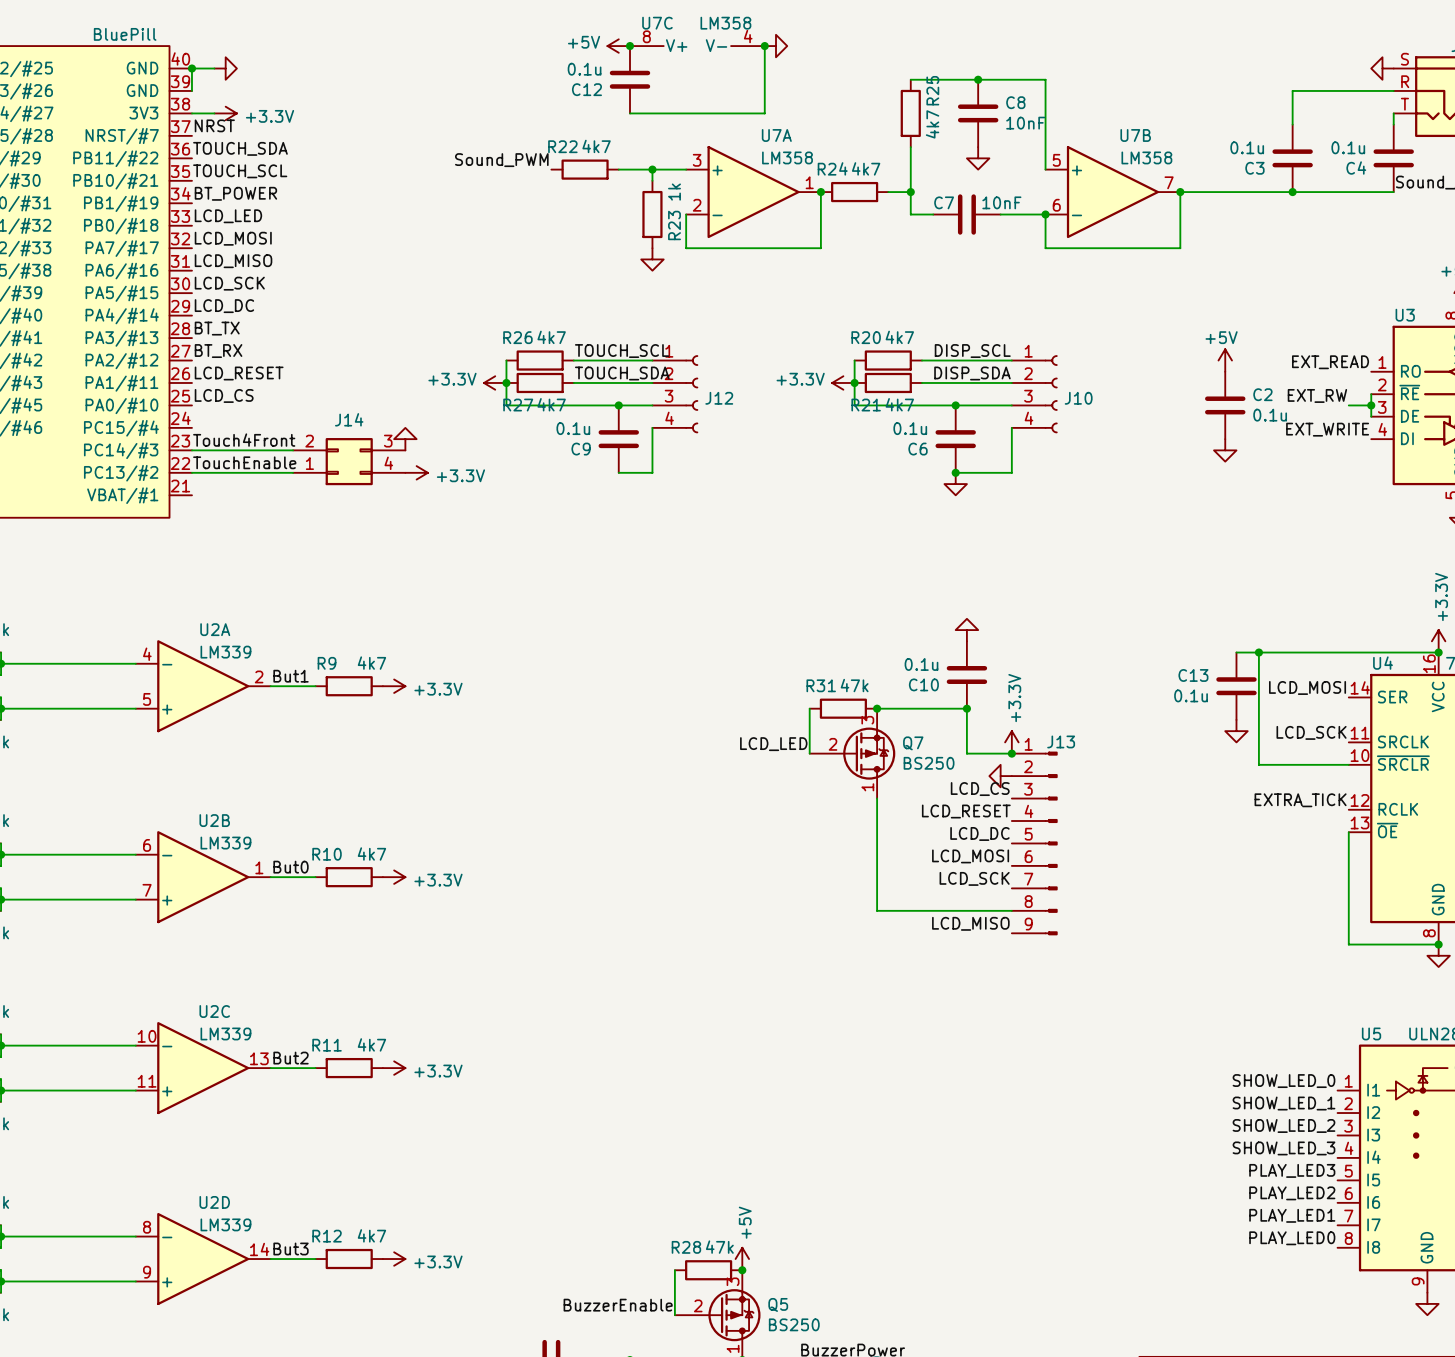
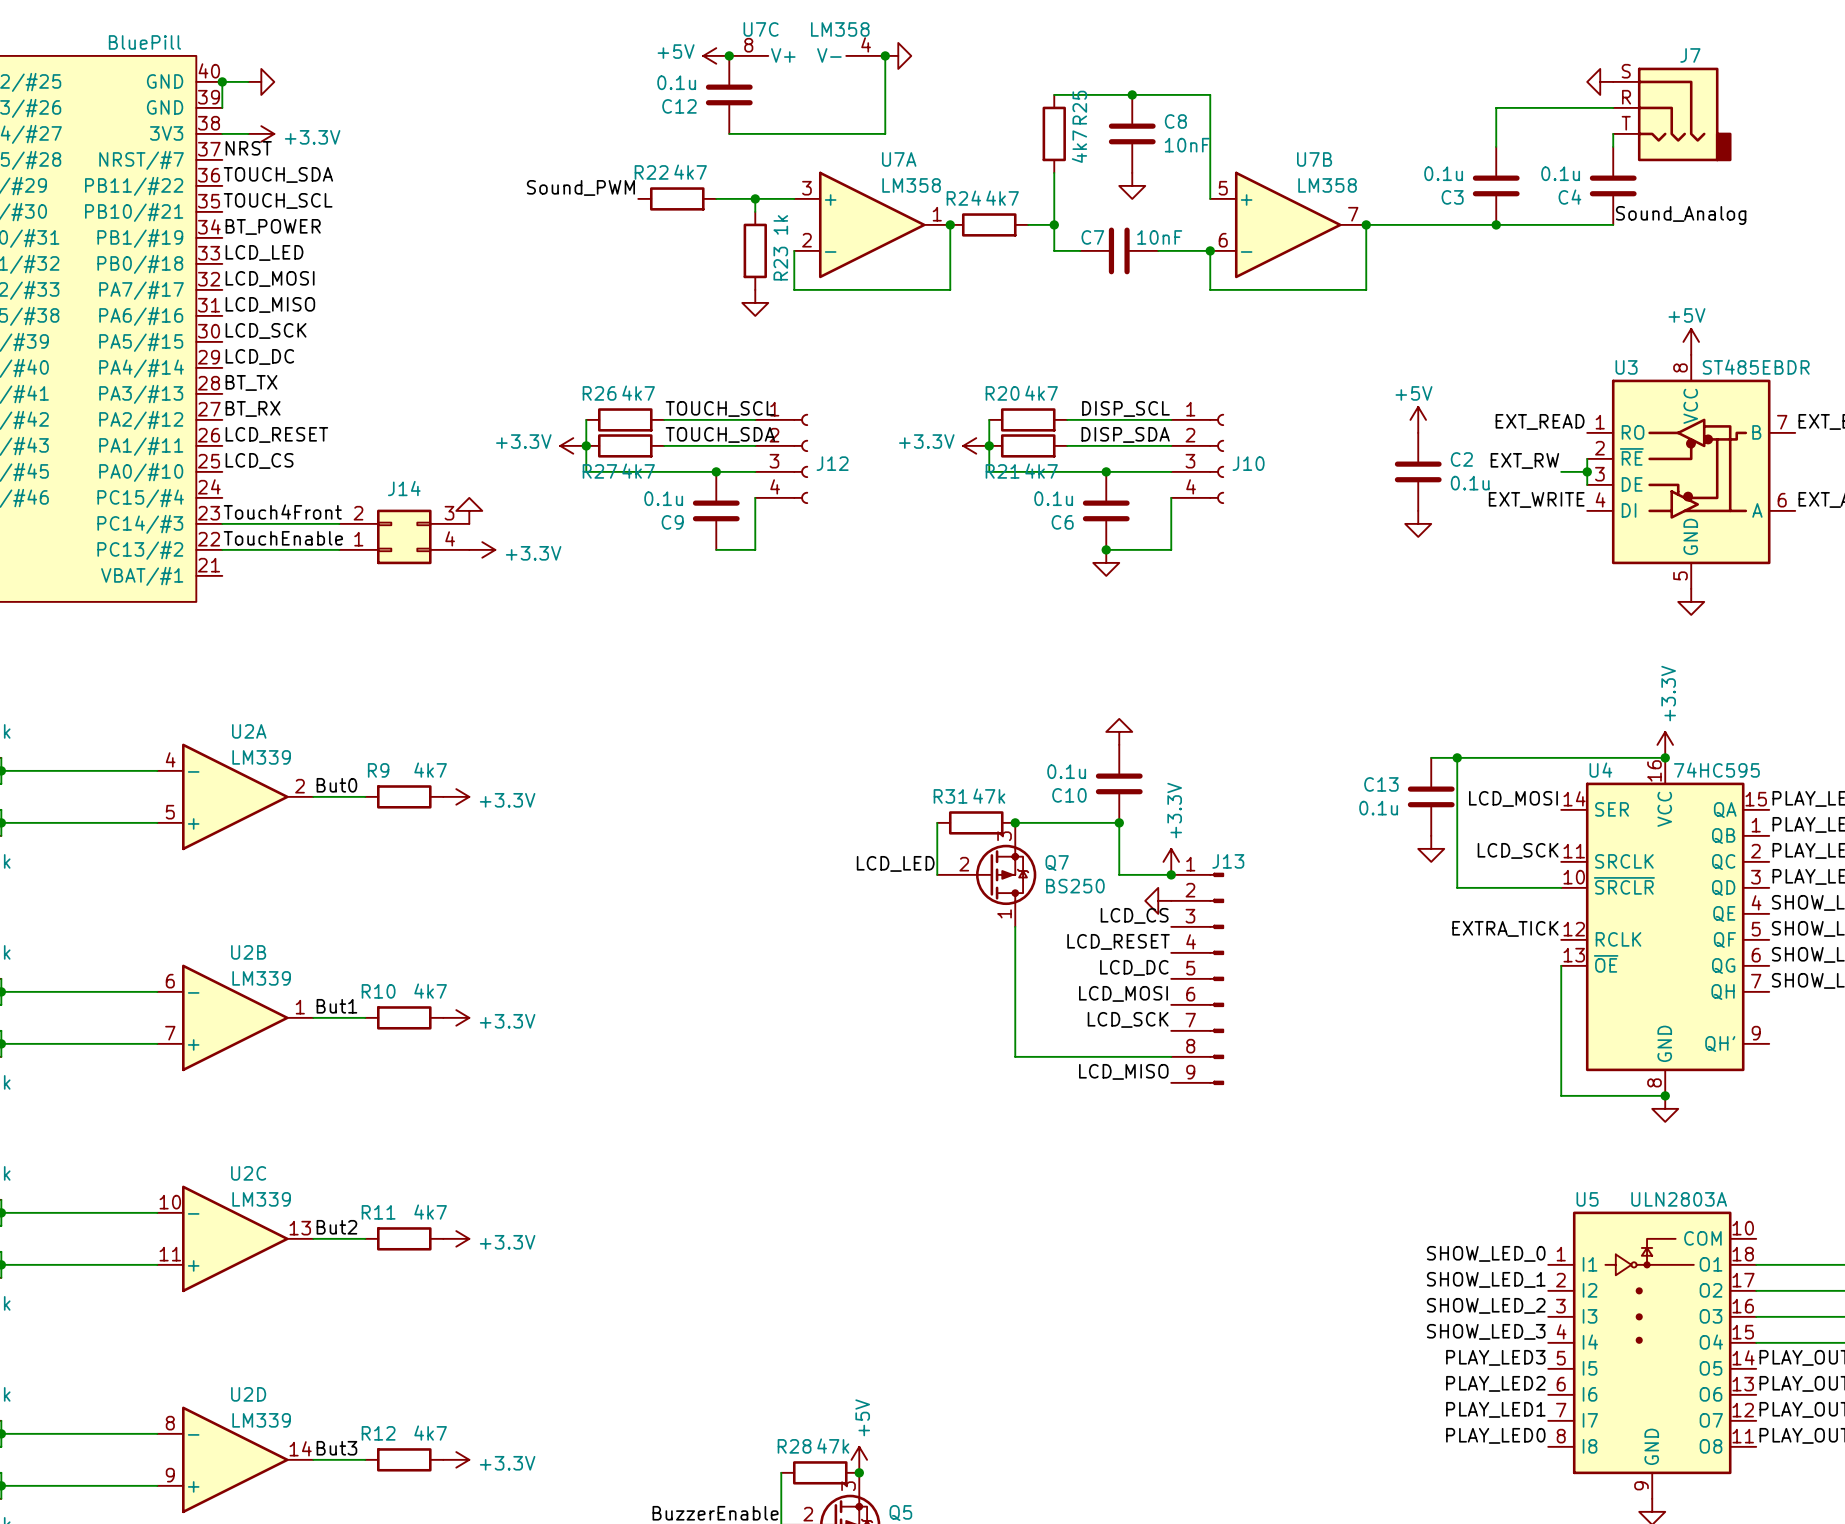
label: But1 (291, 676) -> But0 (336, 785)
label: But0 (291, 867) -> But1 (336, 1006)

